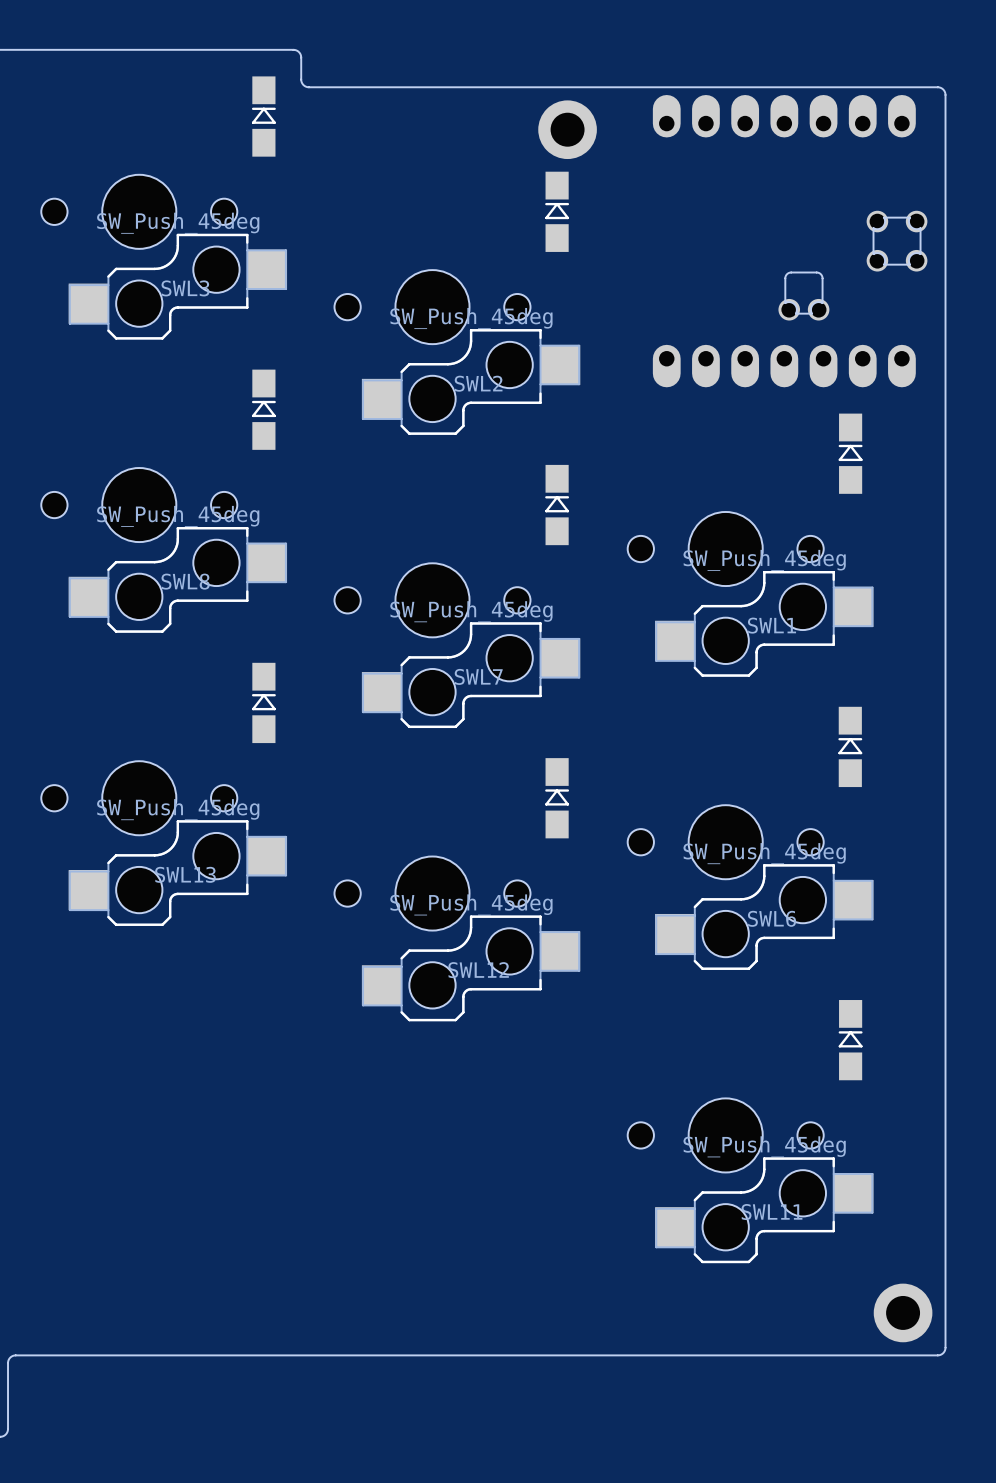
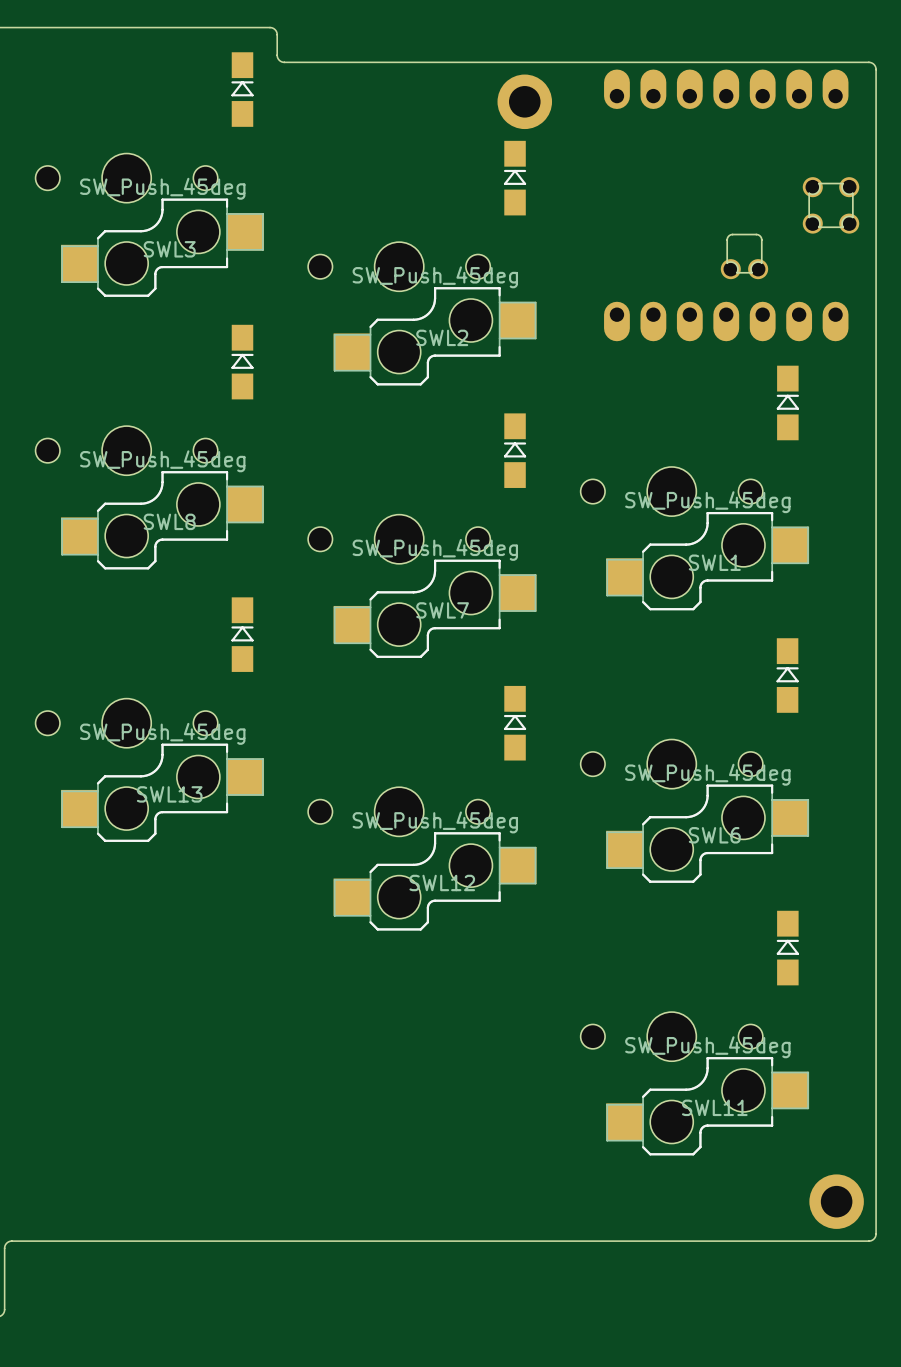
SWL3 footprint: [41, 174, 288, 340] -> [35, 153, 265, 297]
SWL2 footprint: [334, 270, 581, 435] -> [308, 242, 537, 386]
SWL8 footprint: [41, 467, 288, 633] -> [35, 426, 265, 570]
SWL1 footprint: [627, 511, 874, 677] -> [580, 466, 810, 611]
SWL7 footprint: [334, 563, 581, 729] -> [308, 514, 537, 658]
SWL13 footprint: [41, 761, 288, 926] -> [35, 698, 265, 842]
SWL6 footprint: [627, 805, 874, 970] -> [580, 739, 810, 883]
SWL12 footprint: [334, 856, 581, 1022] -> [308, 787, 537, 931]
SWL11 footprint: [627, 1098, 874, 1264] -> [580, 1012, 810, 1156]

